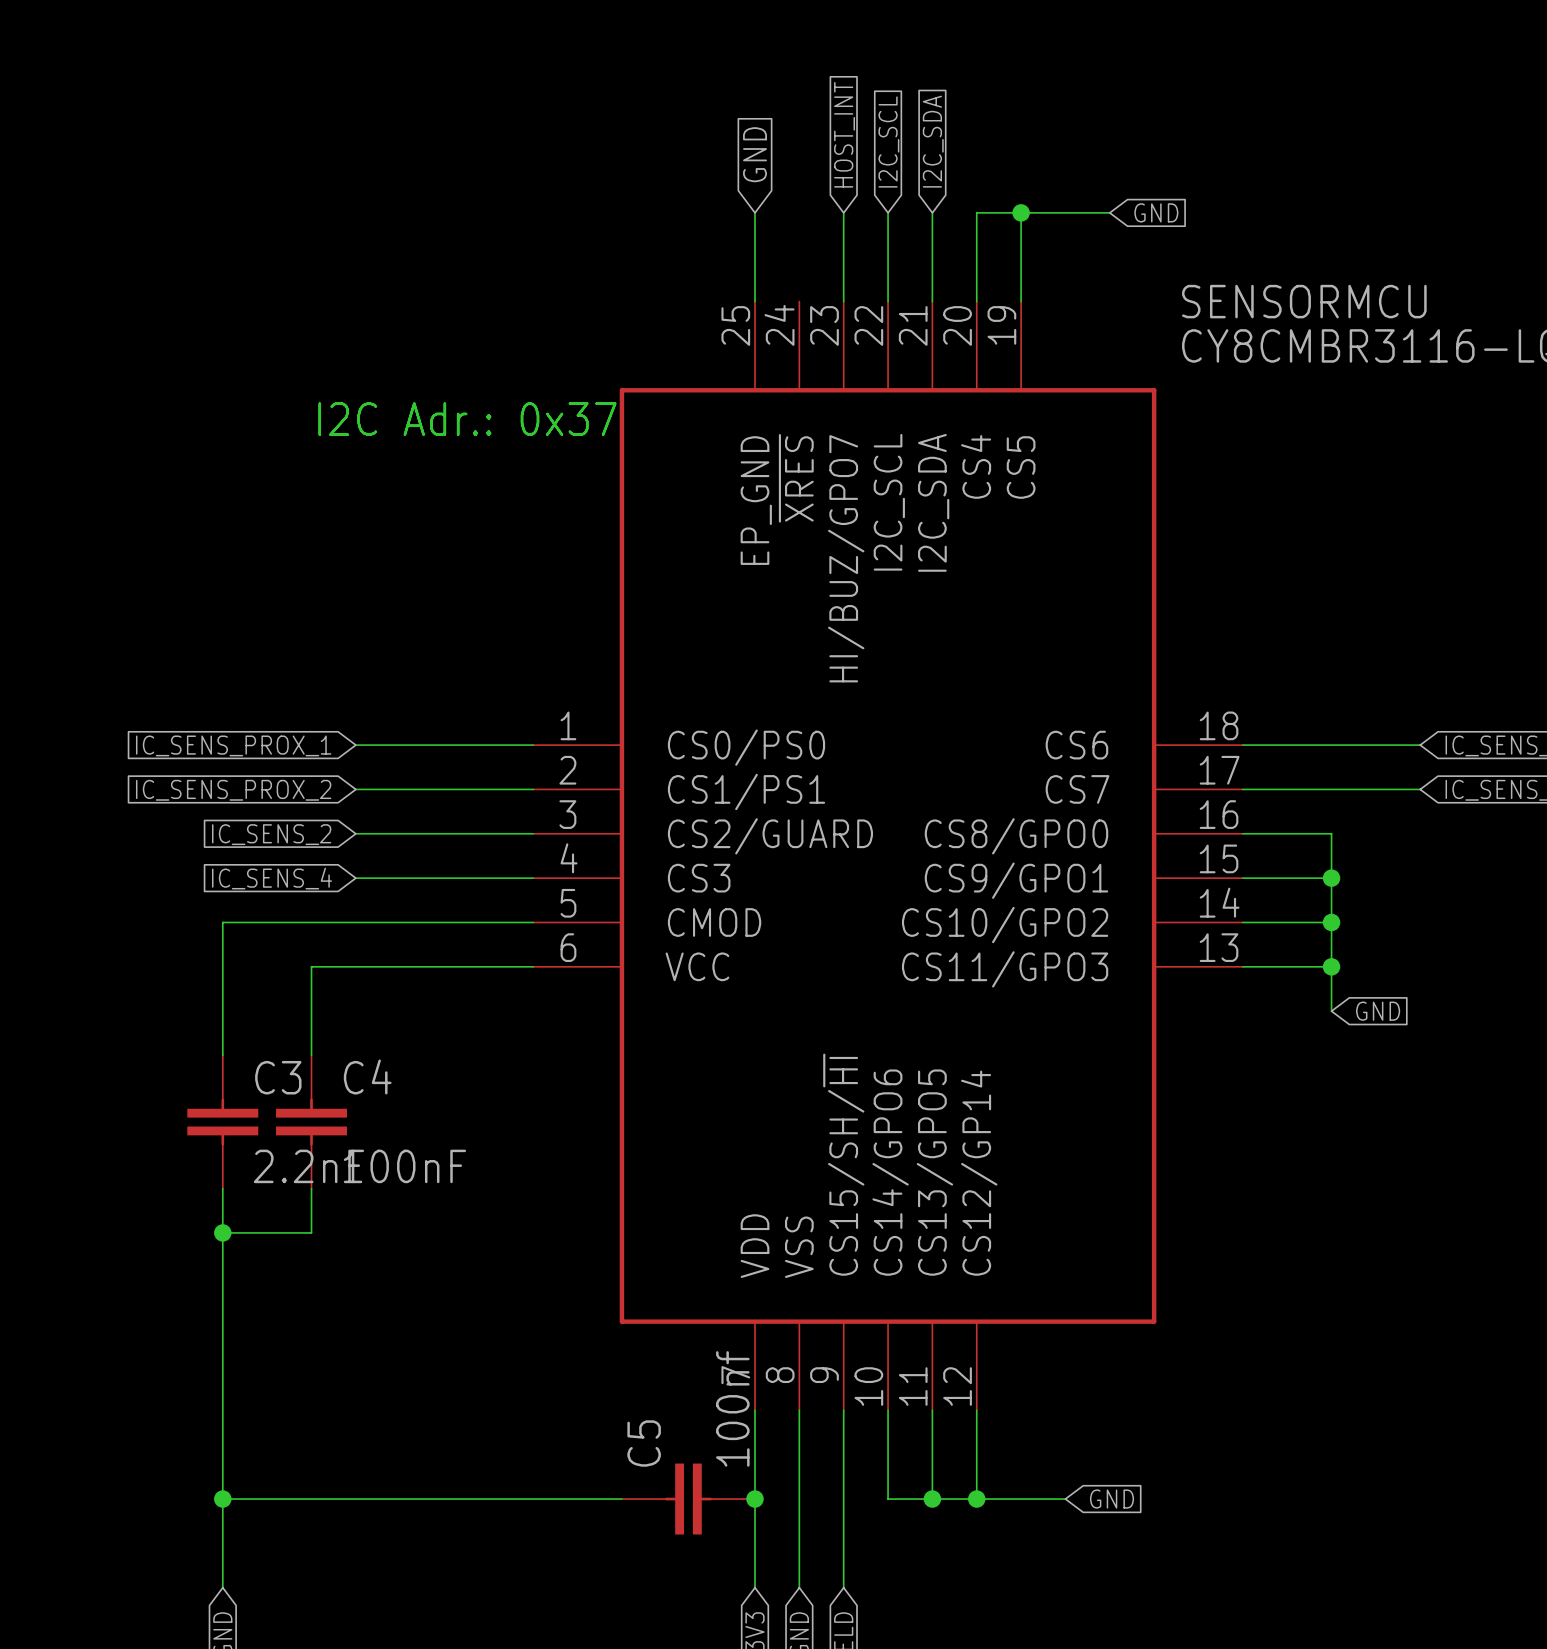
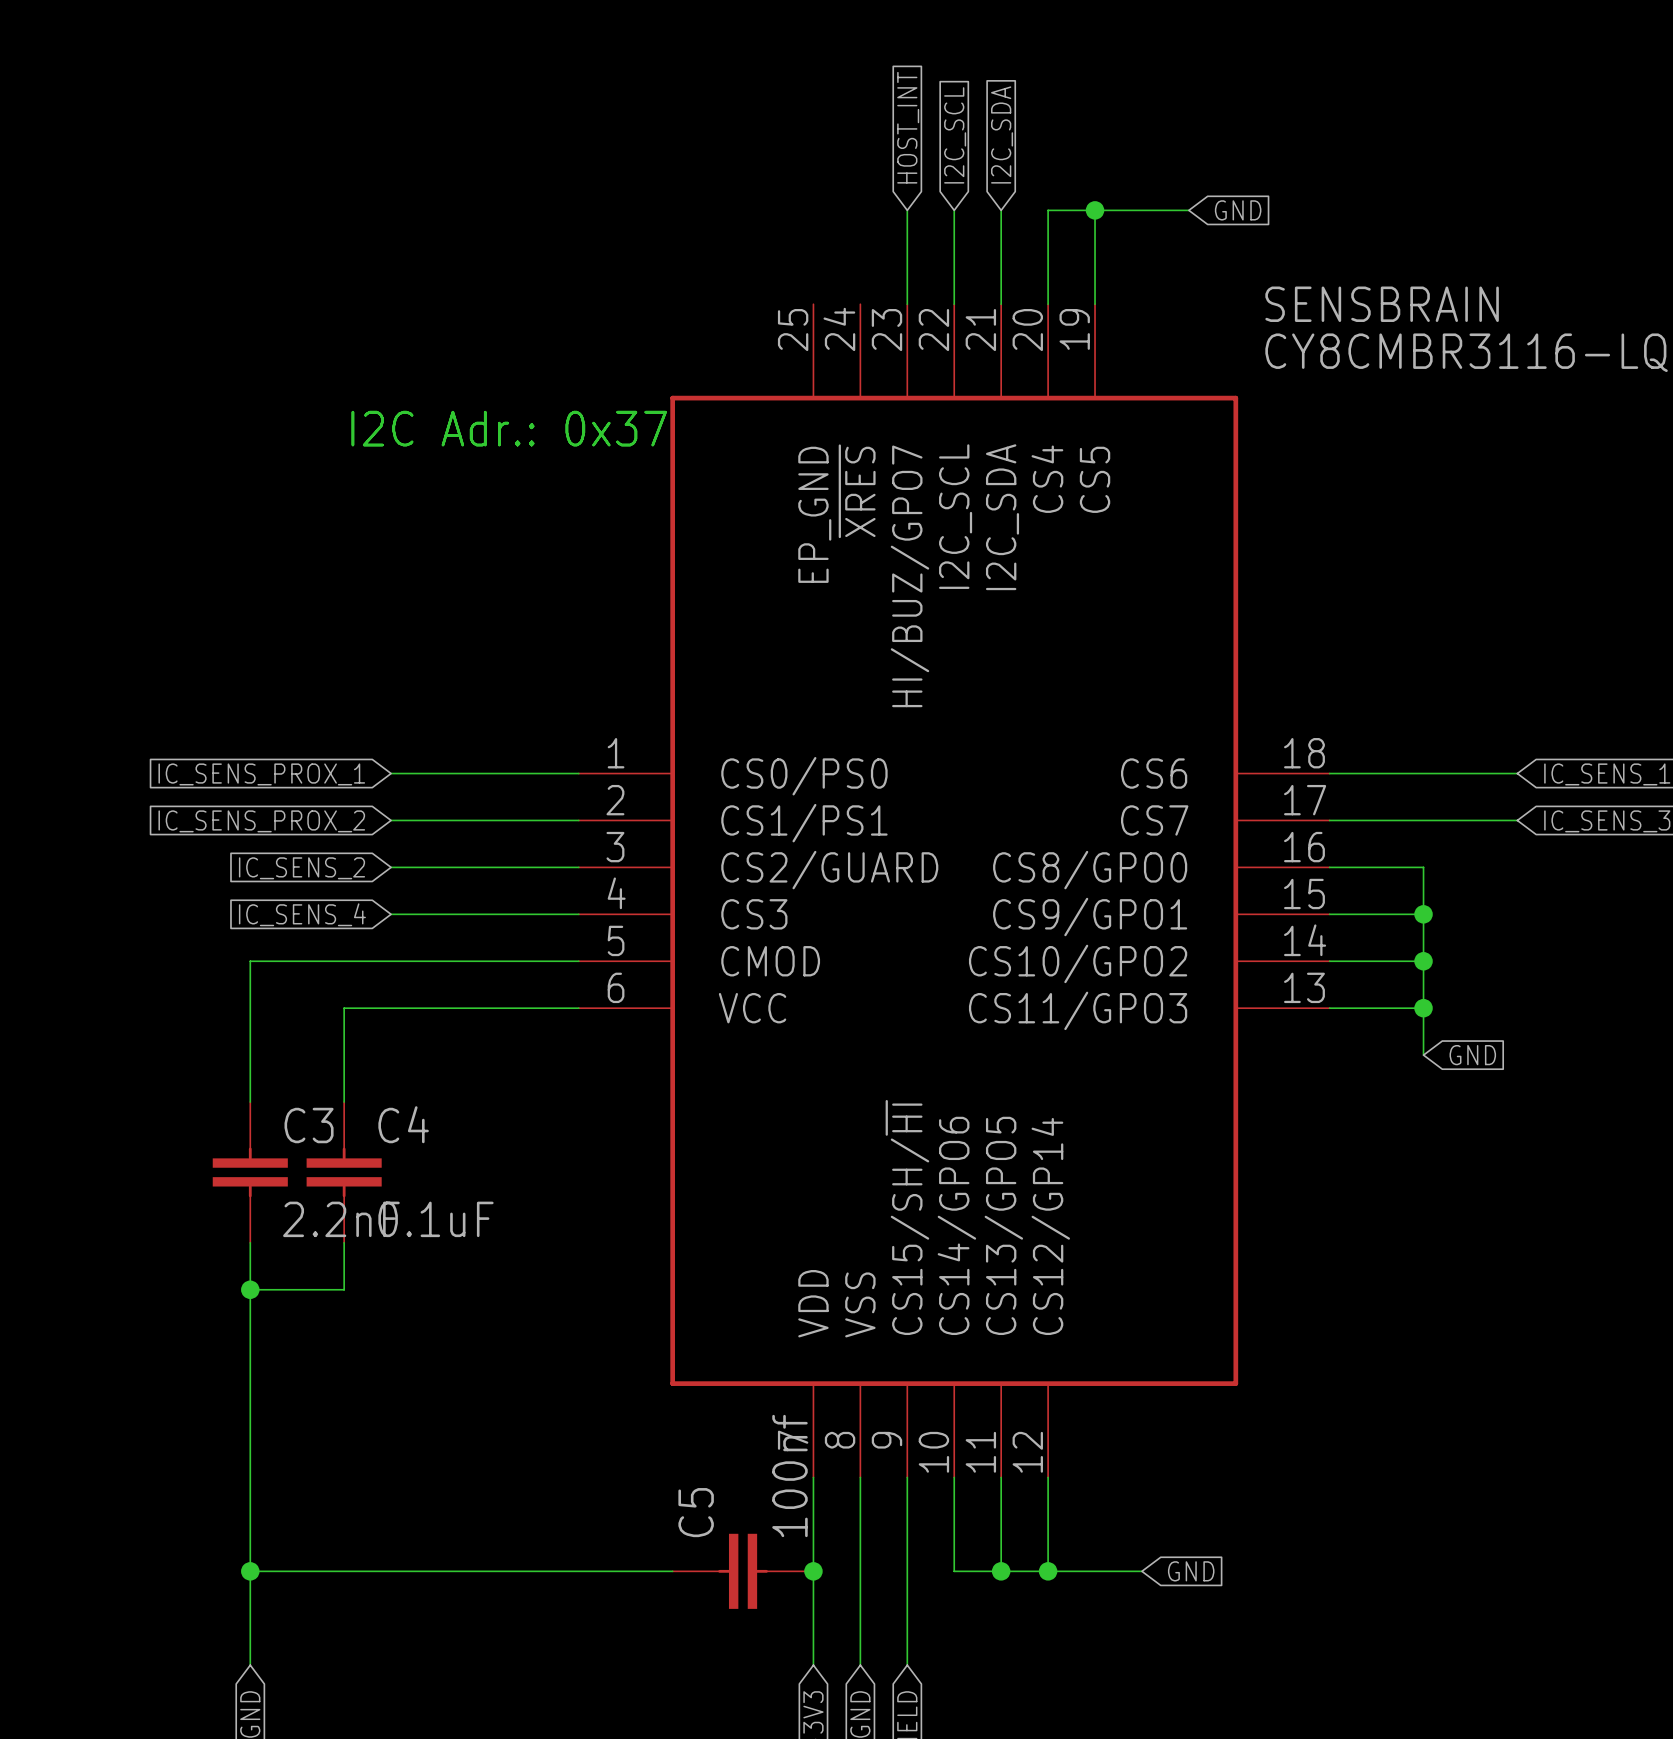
global label: GND (755, 154) -> none
wire: (755, 212) (755, 301) -> none
SENSORMCU name: SENSORMCU (1304, 301) -> SENSBRAIN (1382, 304)
C4 value: 100nF (404, 1166) -> 0.1uF (435, 1219)

